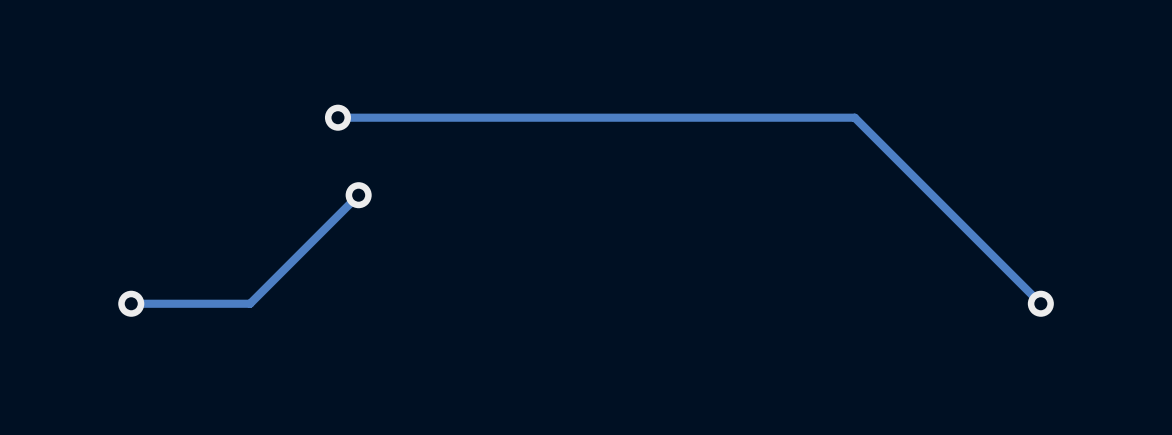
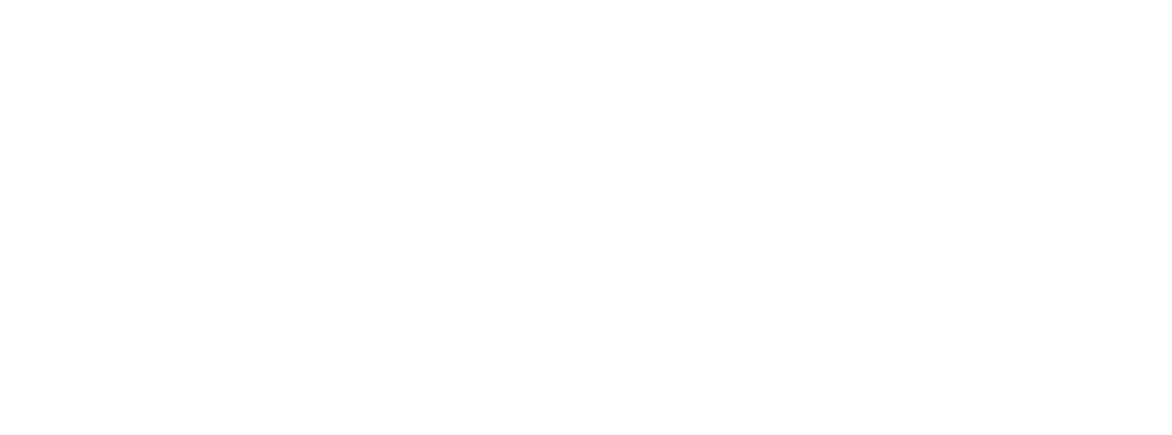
track: (337, 117) (854, 117) (1040, 303) -> none
via: (337, 117) -> none
track: (358, 195) (250, 303) (131, 303) -> none
via: (358, 195) -> none
via: (131, 303) -> none
via: (1040, 303) -> none

